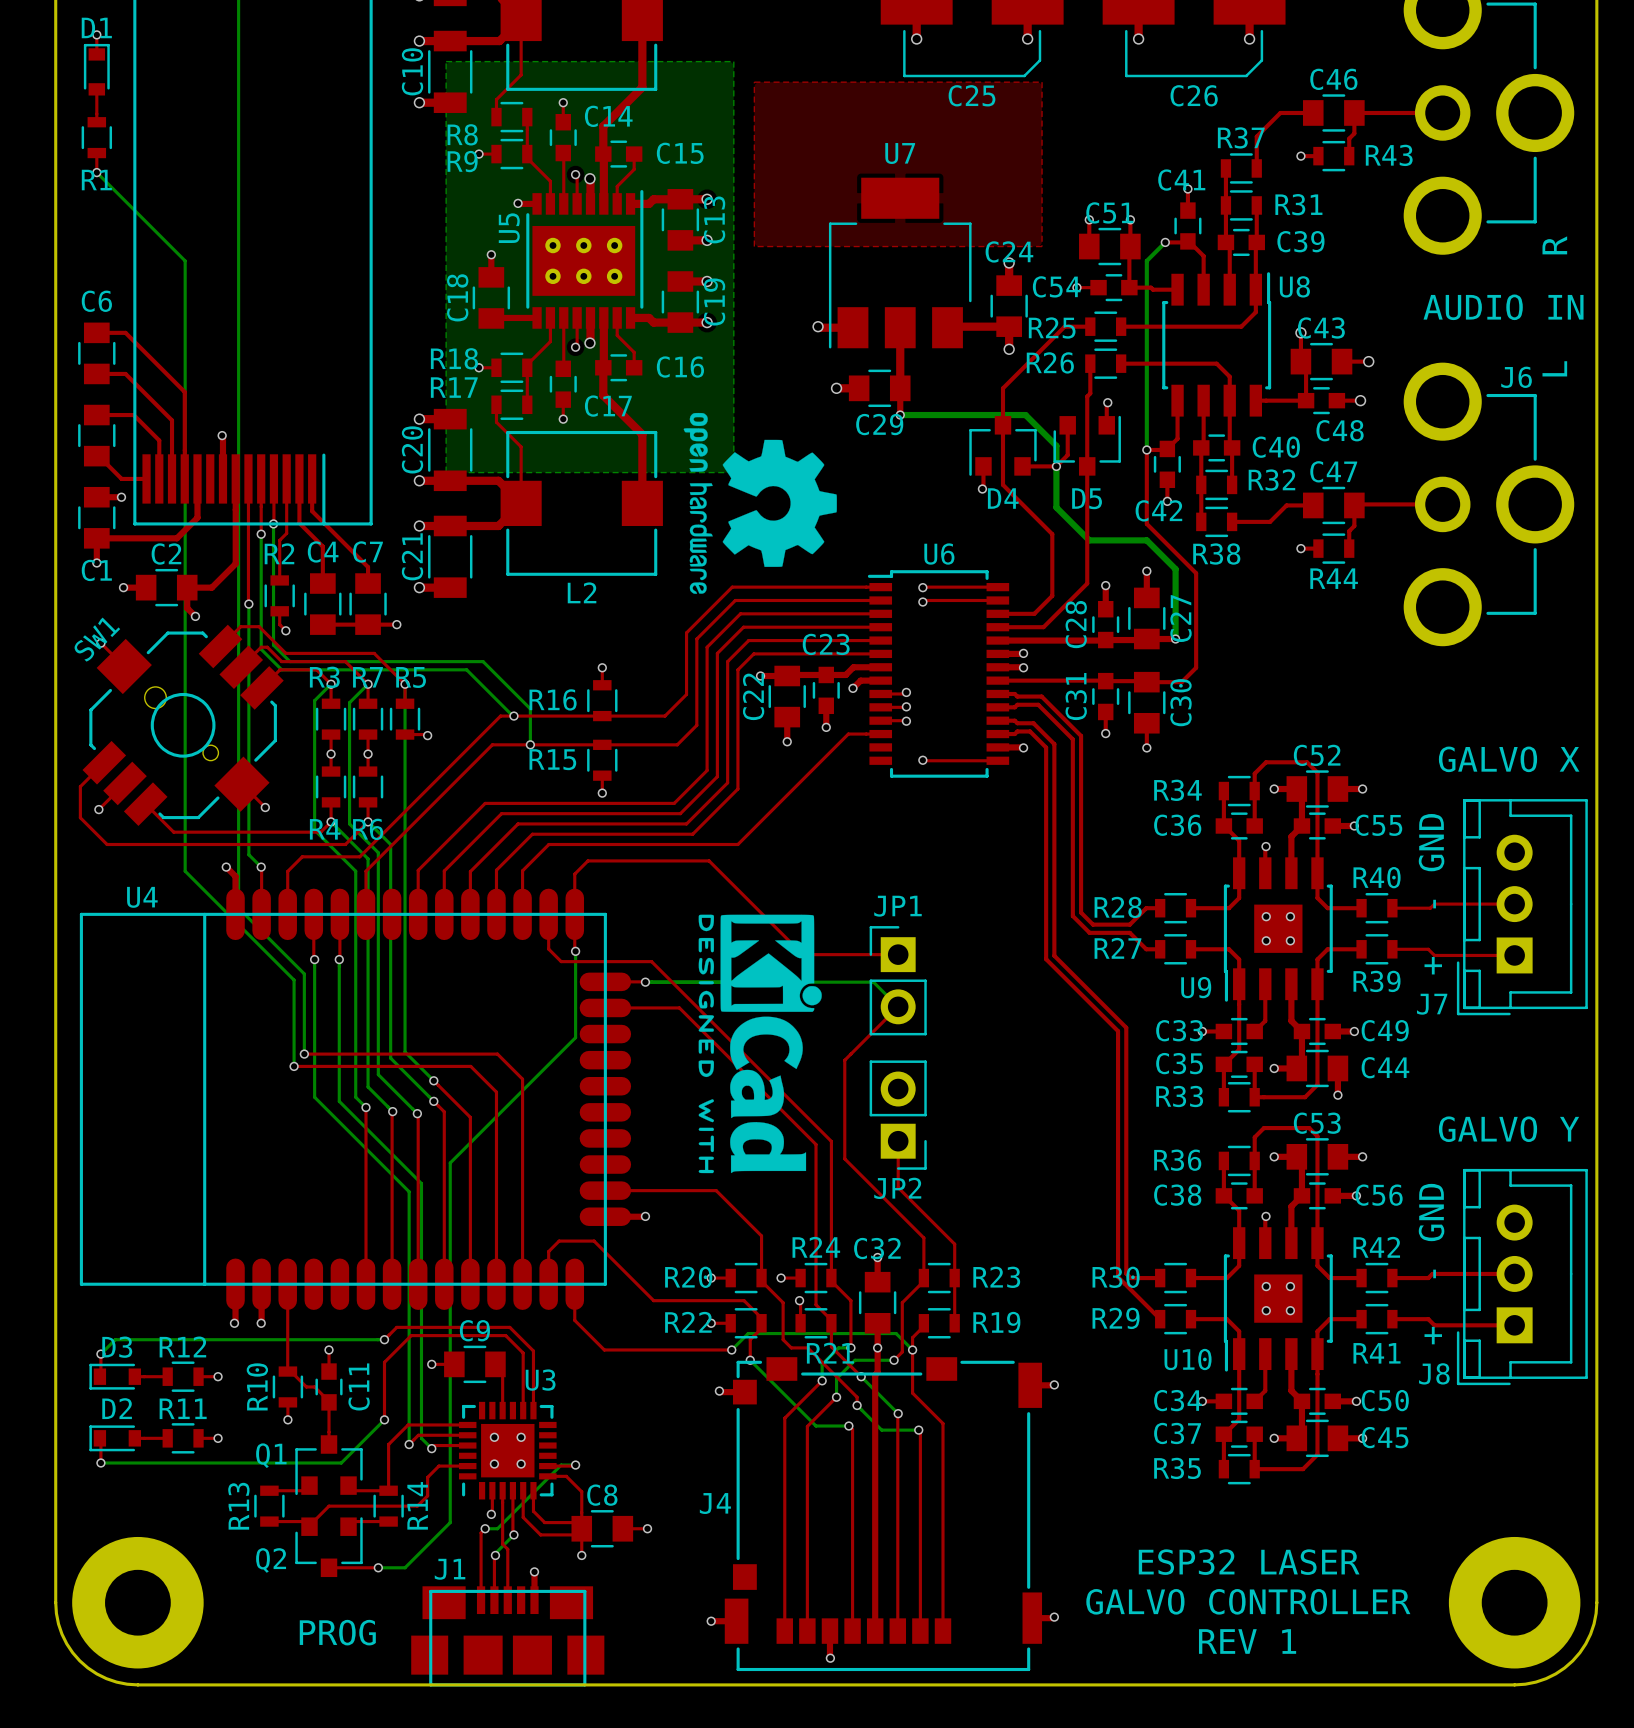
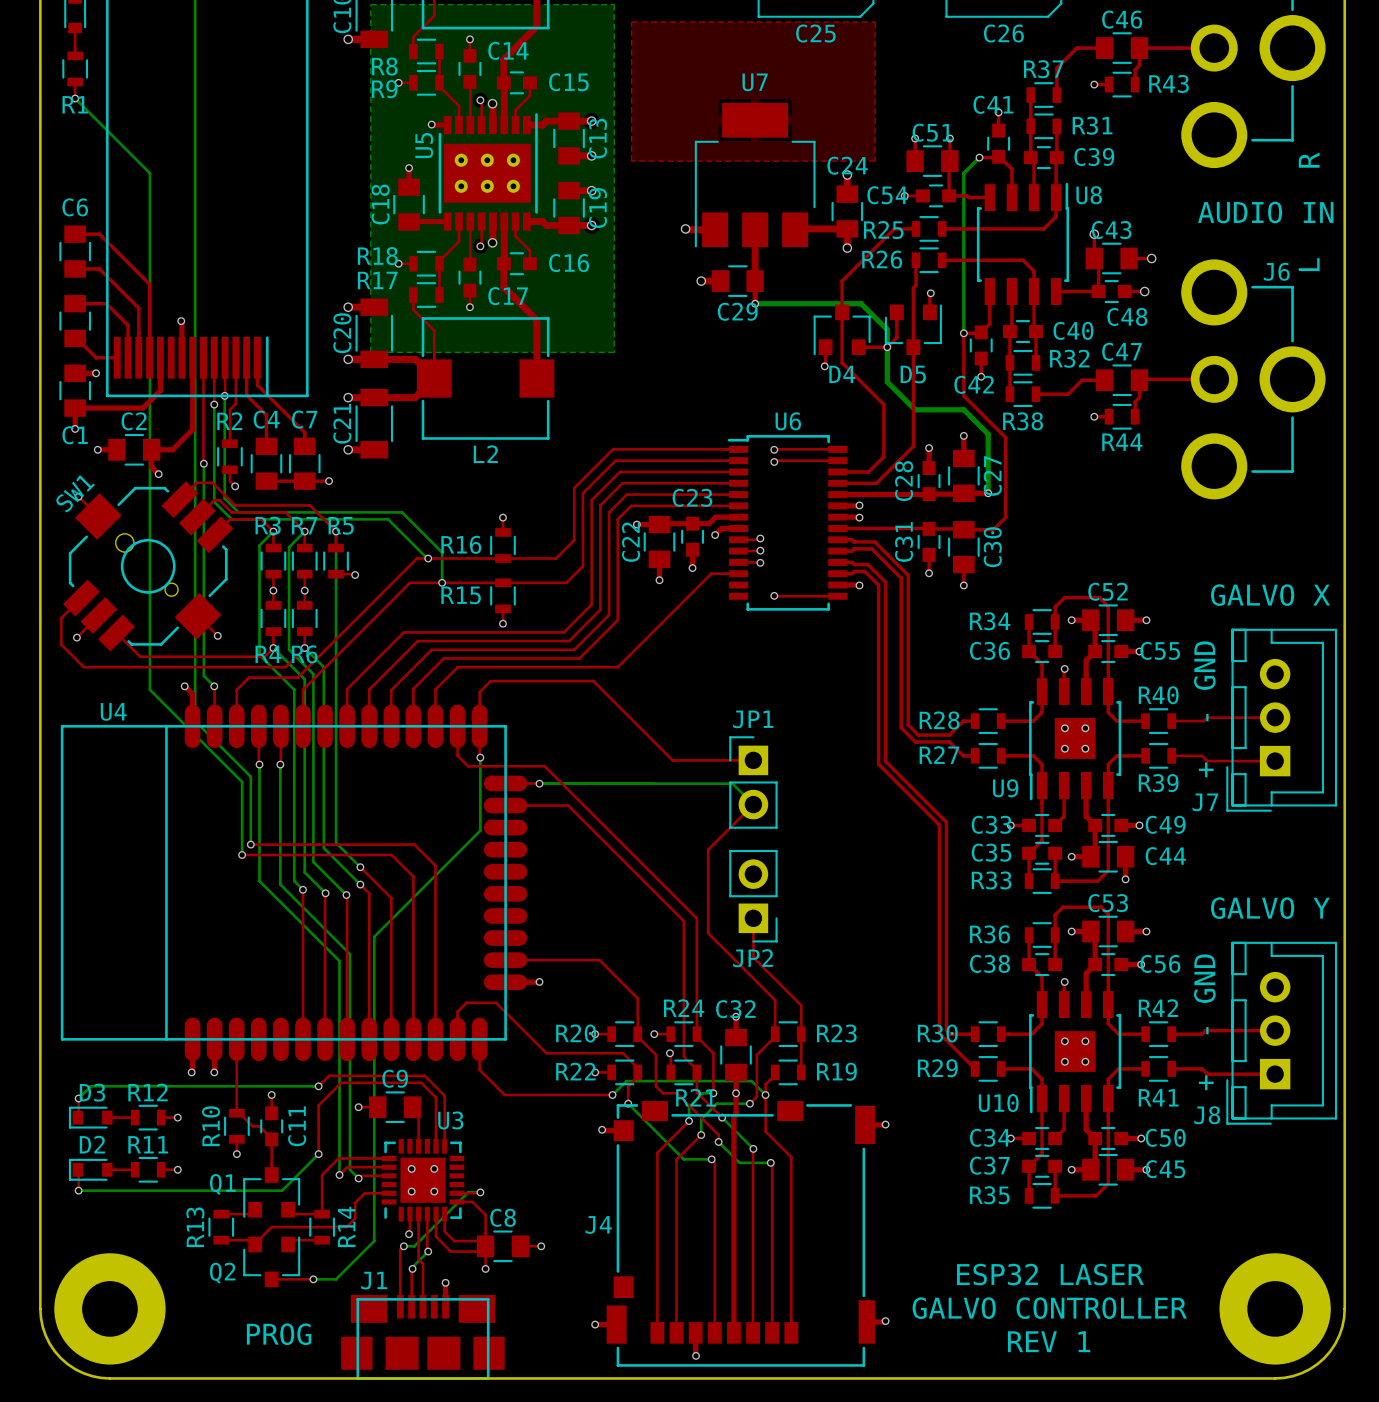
drawing: [683, 412, 837, 594] -> none
drawing: [698, 914, 822, 1174] -> none

